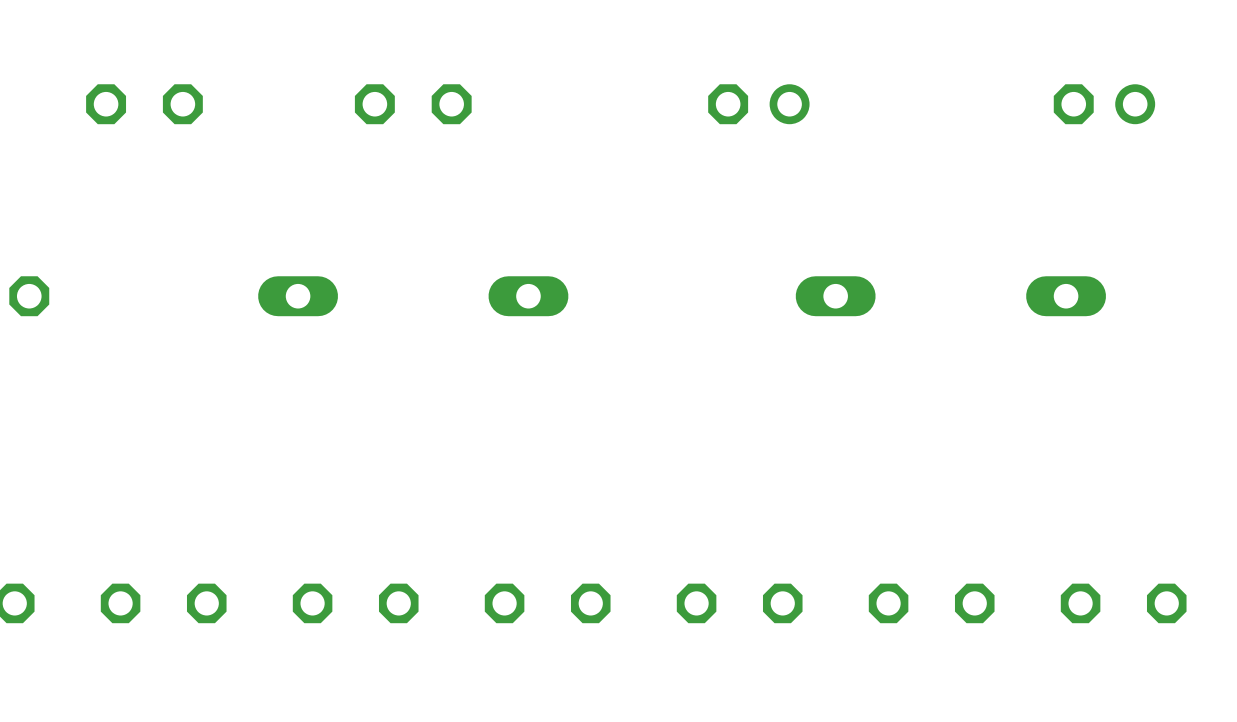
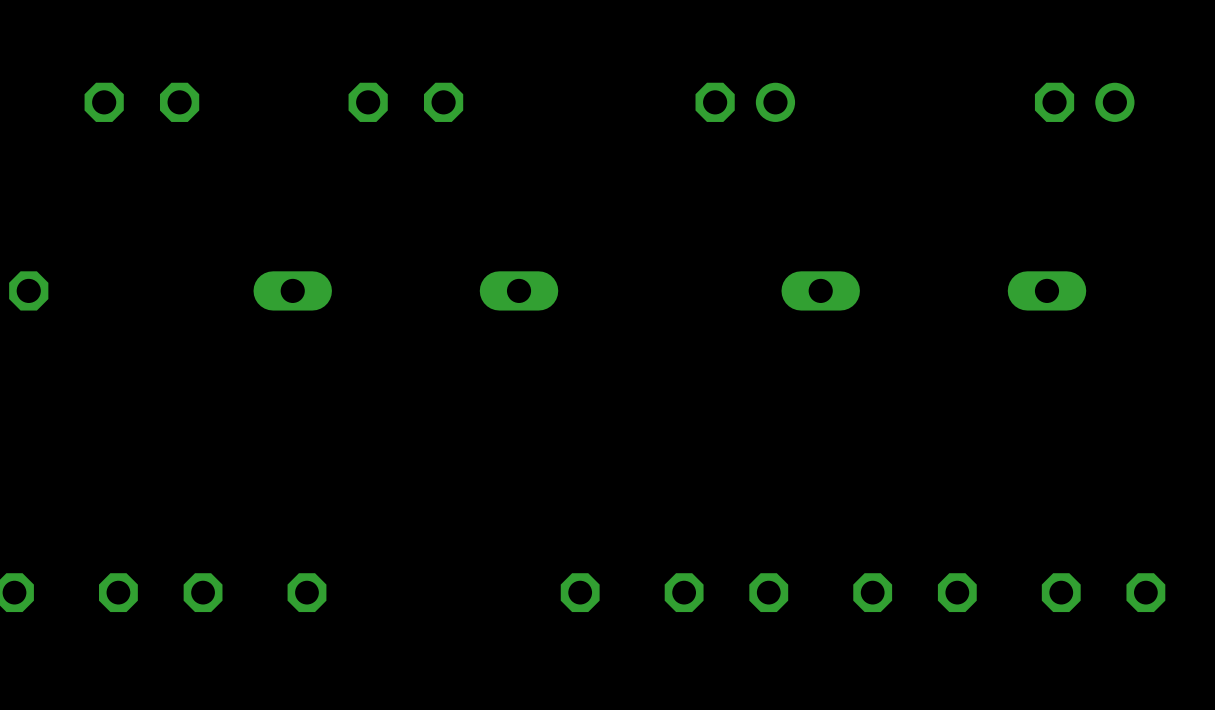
part: (451, 603) -> none

